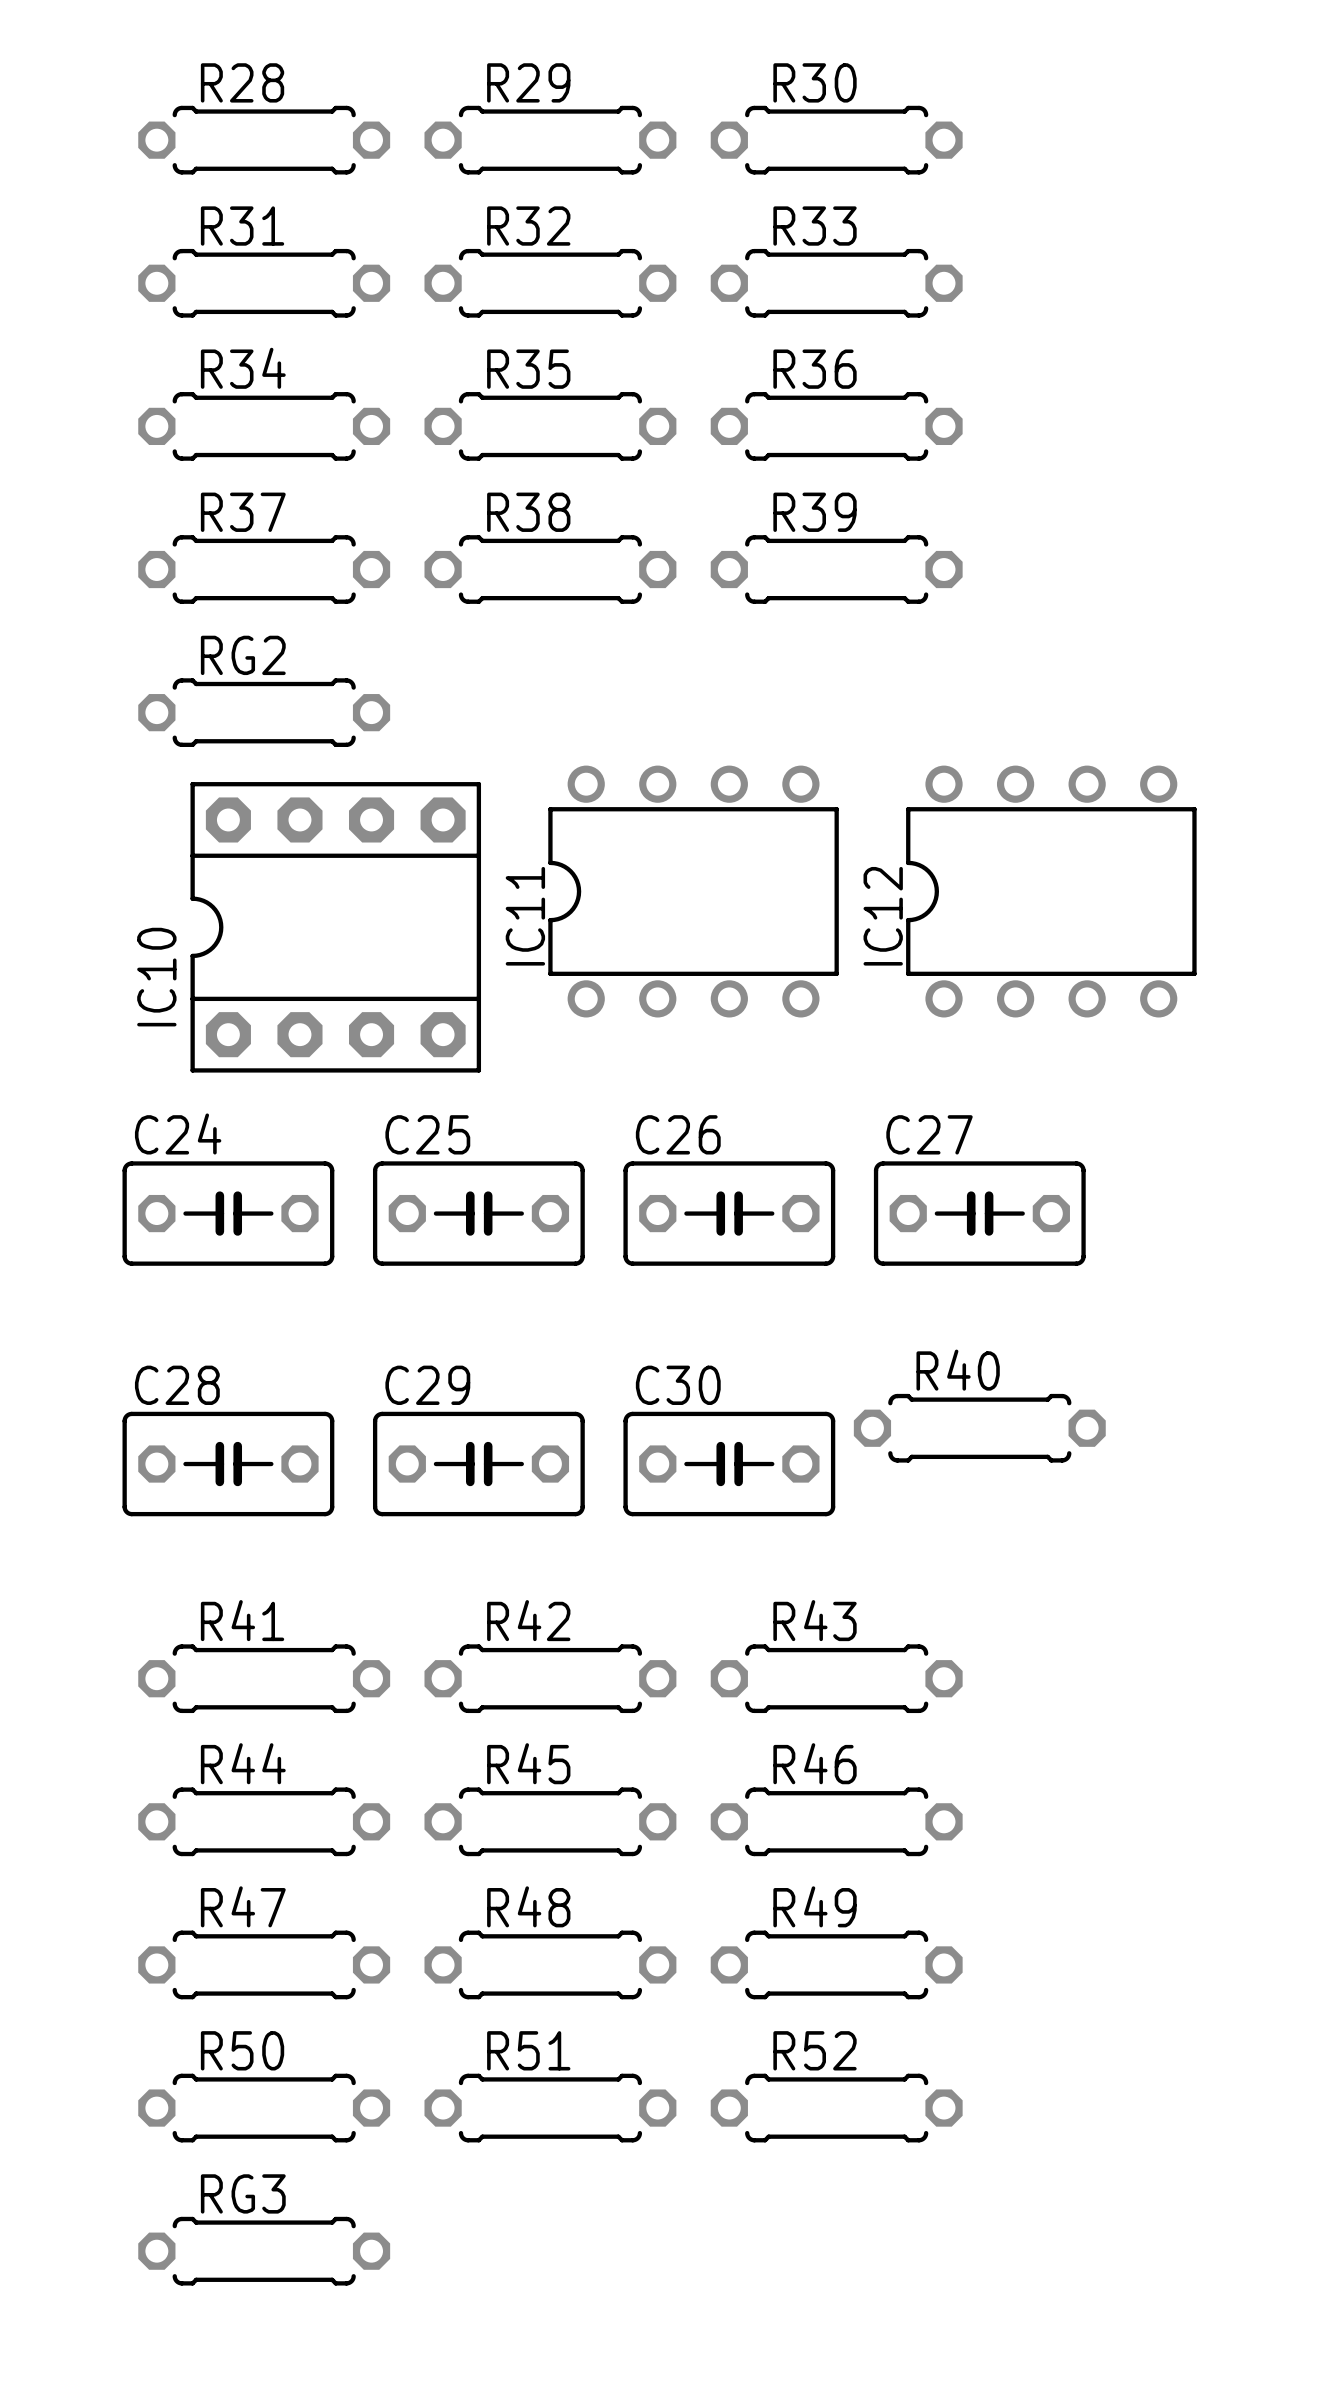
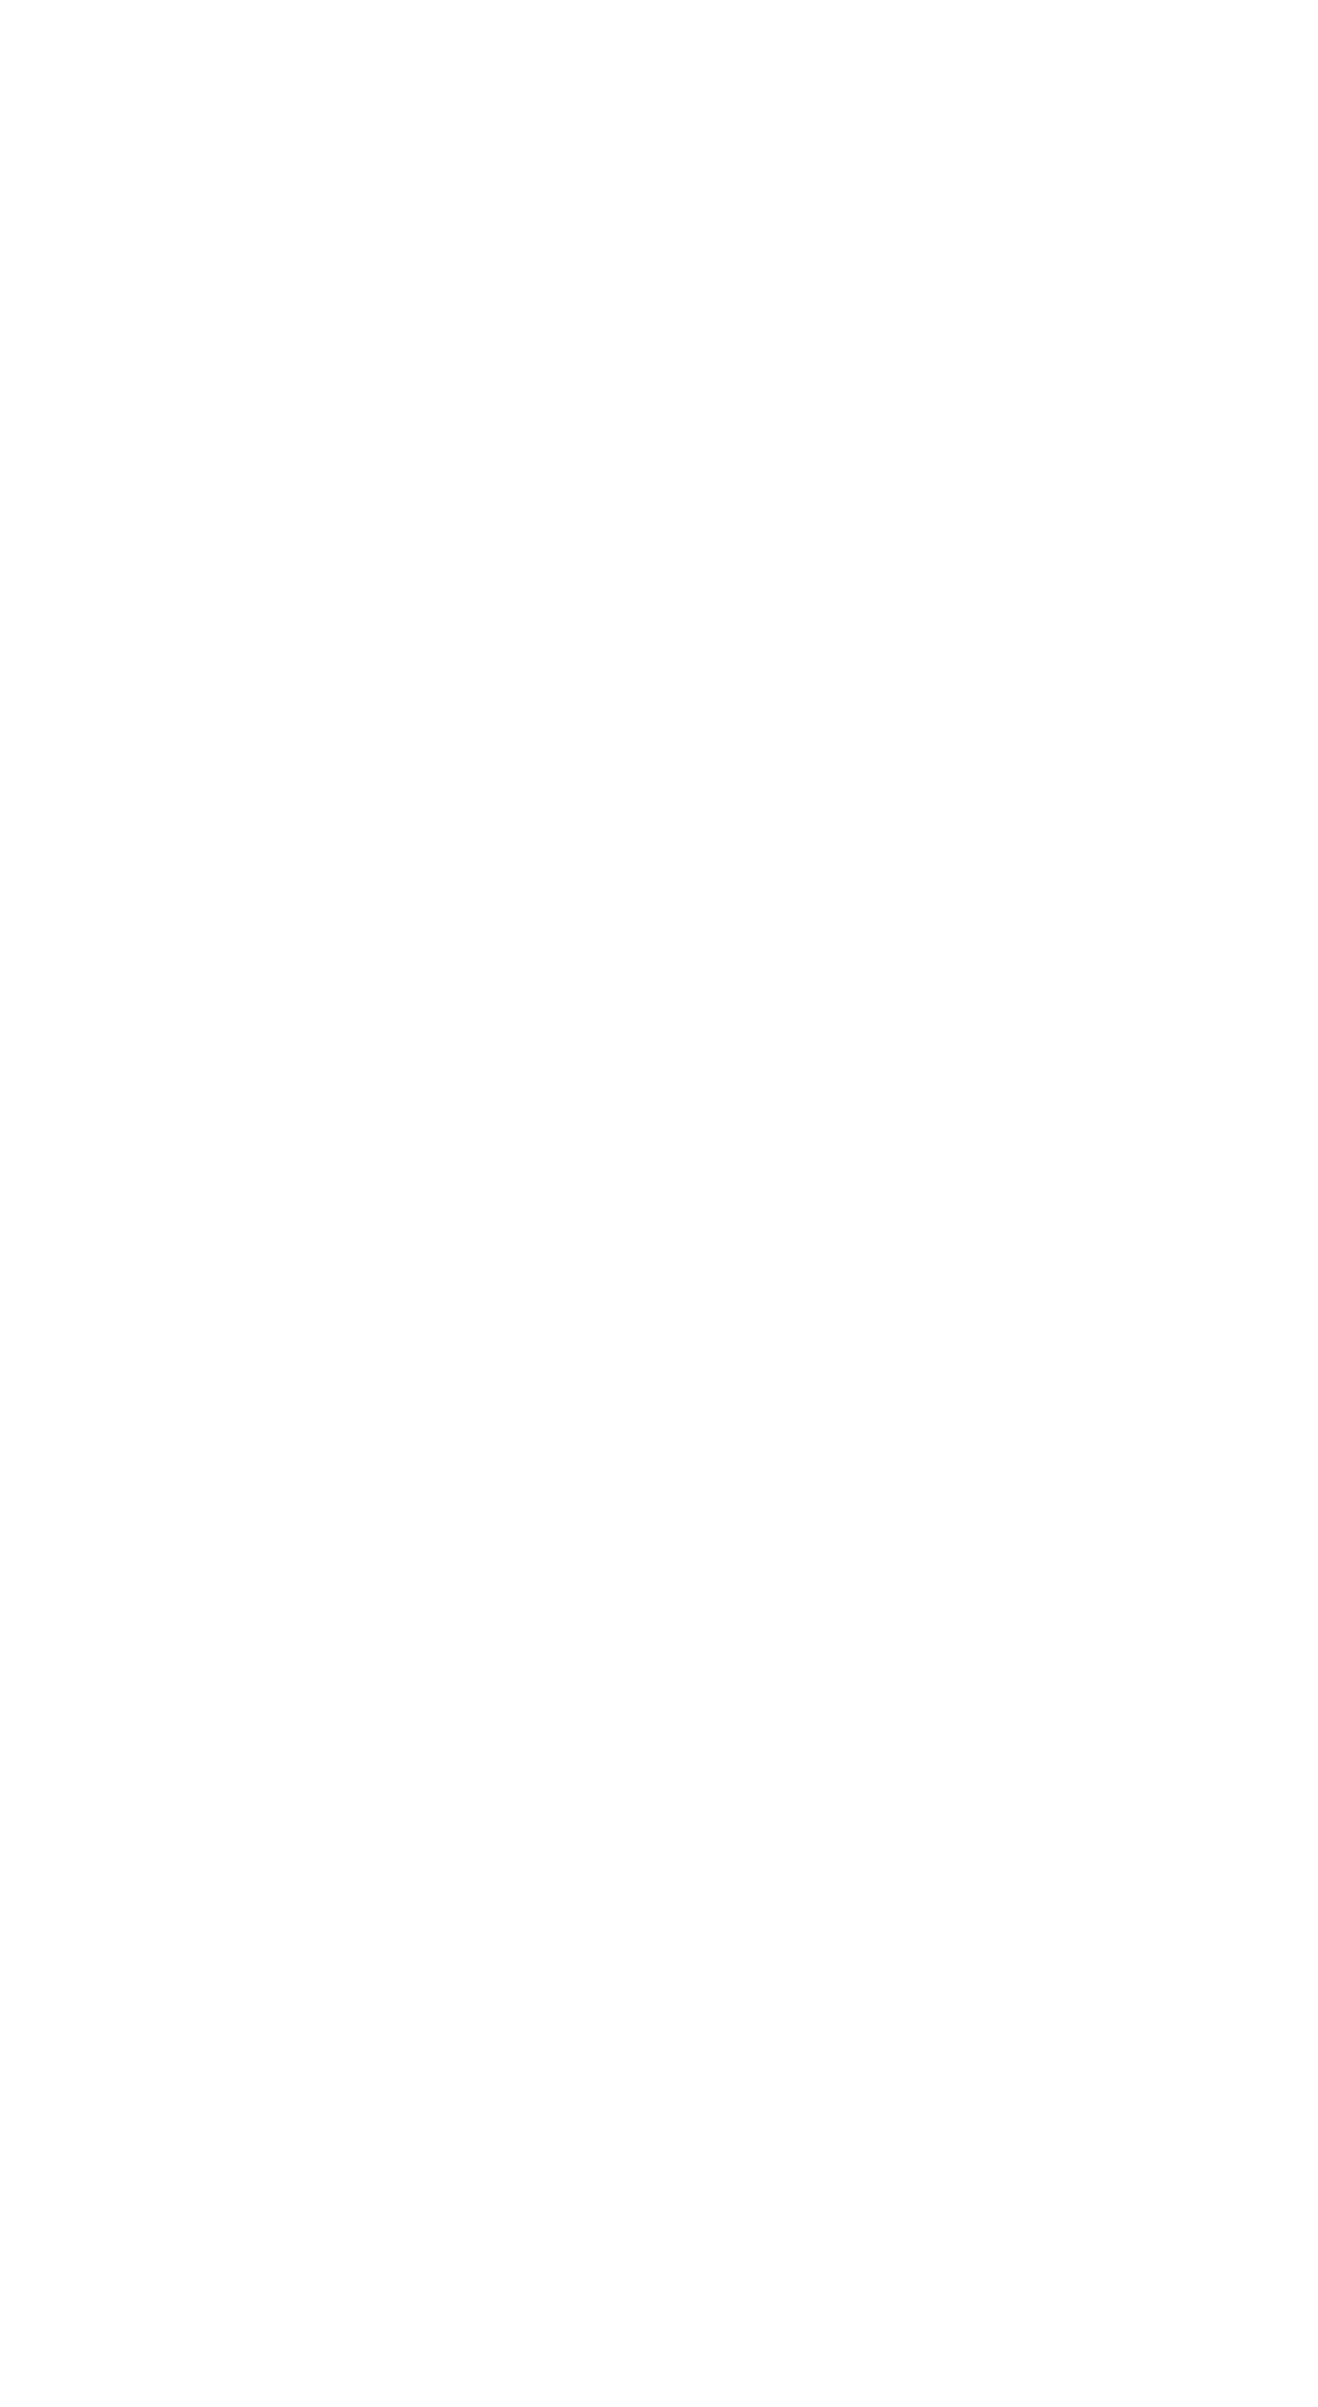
R28: (264, 140) -> none
R29: (550, 140) -> none
R30: (836, 140) -> none
R31: (264, 283) -> none
R32: (550, 283) -> none
R33: (836, 283) -> none
R34: (264, 426) -> none
R35: (550, 426) -> none
R36: (836, 426) -> none
R37: (264, 569) -> none
R38: (550, 569) -> none
R39: (836, 569) -> none
RG2: (264, 712) -> none
IC11: (693, 891) -> none
IC12: (1051, 891) -> none
IC10: (335, 927) -> none
C24: (228, 1213) -> none
C25: (478, 1213) -> none
C26: (729, 1213) -> none
C27: (979, 1213) -> none
R40: (979, 1428) -> none
C28: (228, 1464) -> none
C29: (478, 1464) -> none
C30: (729, 1464) -> none
R41: (264, 1678) -> none
R42: (550, 1678) -> none
R43: (836, 1678) -> none
R44: (264, 1821) -> none
R45: (550, 1821) -> none
R46: (836, 1821) -> none
R47: (264, 1964) -> none
R48: (550, 1964) -> none
R49: (836, 1964) -> none
R50: (264, 2108) -> none
R51: (550, 2108) -> none
R52: (836, 2108) -> none
RG3: (264, 2251) -> none

